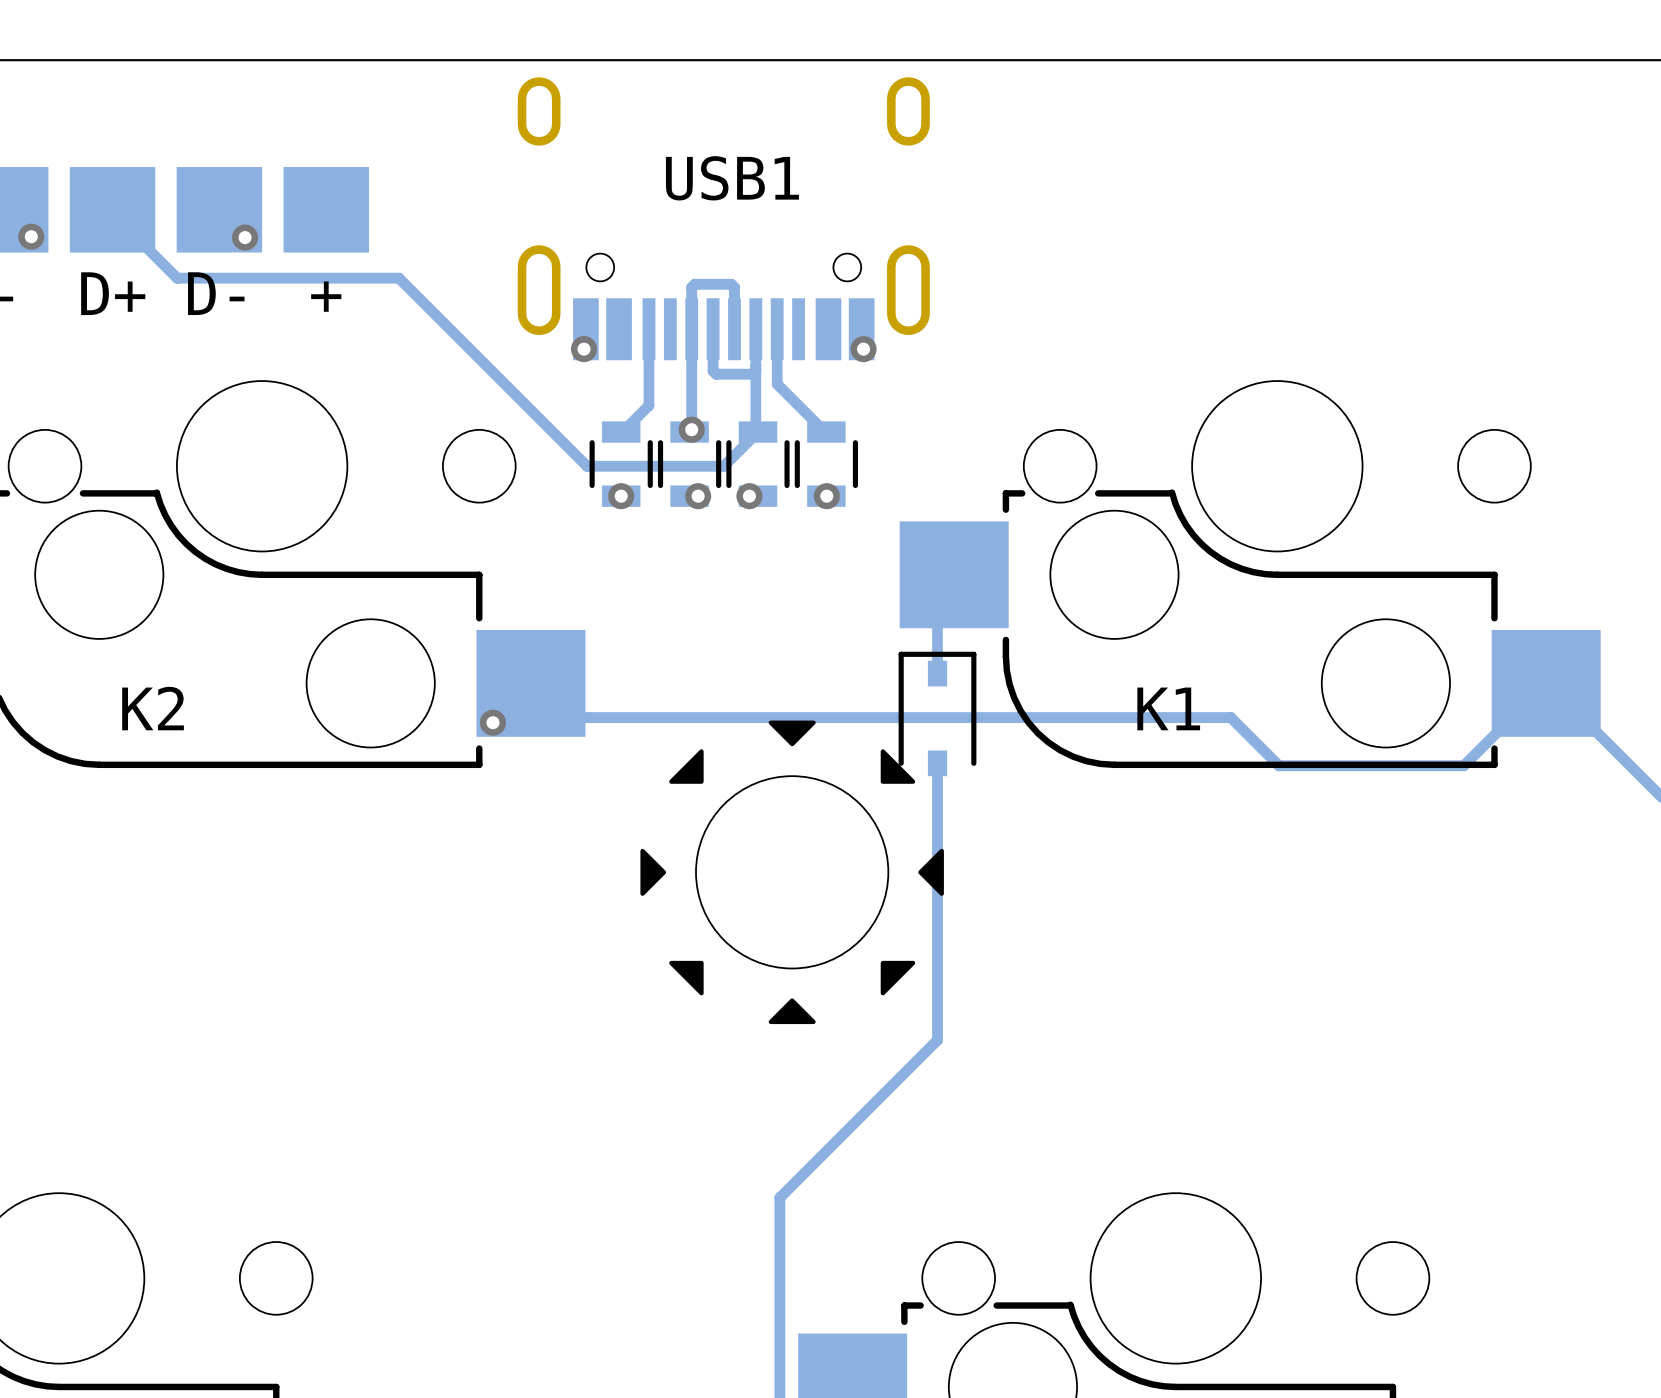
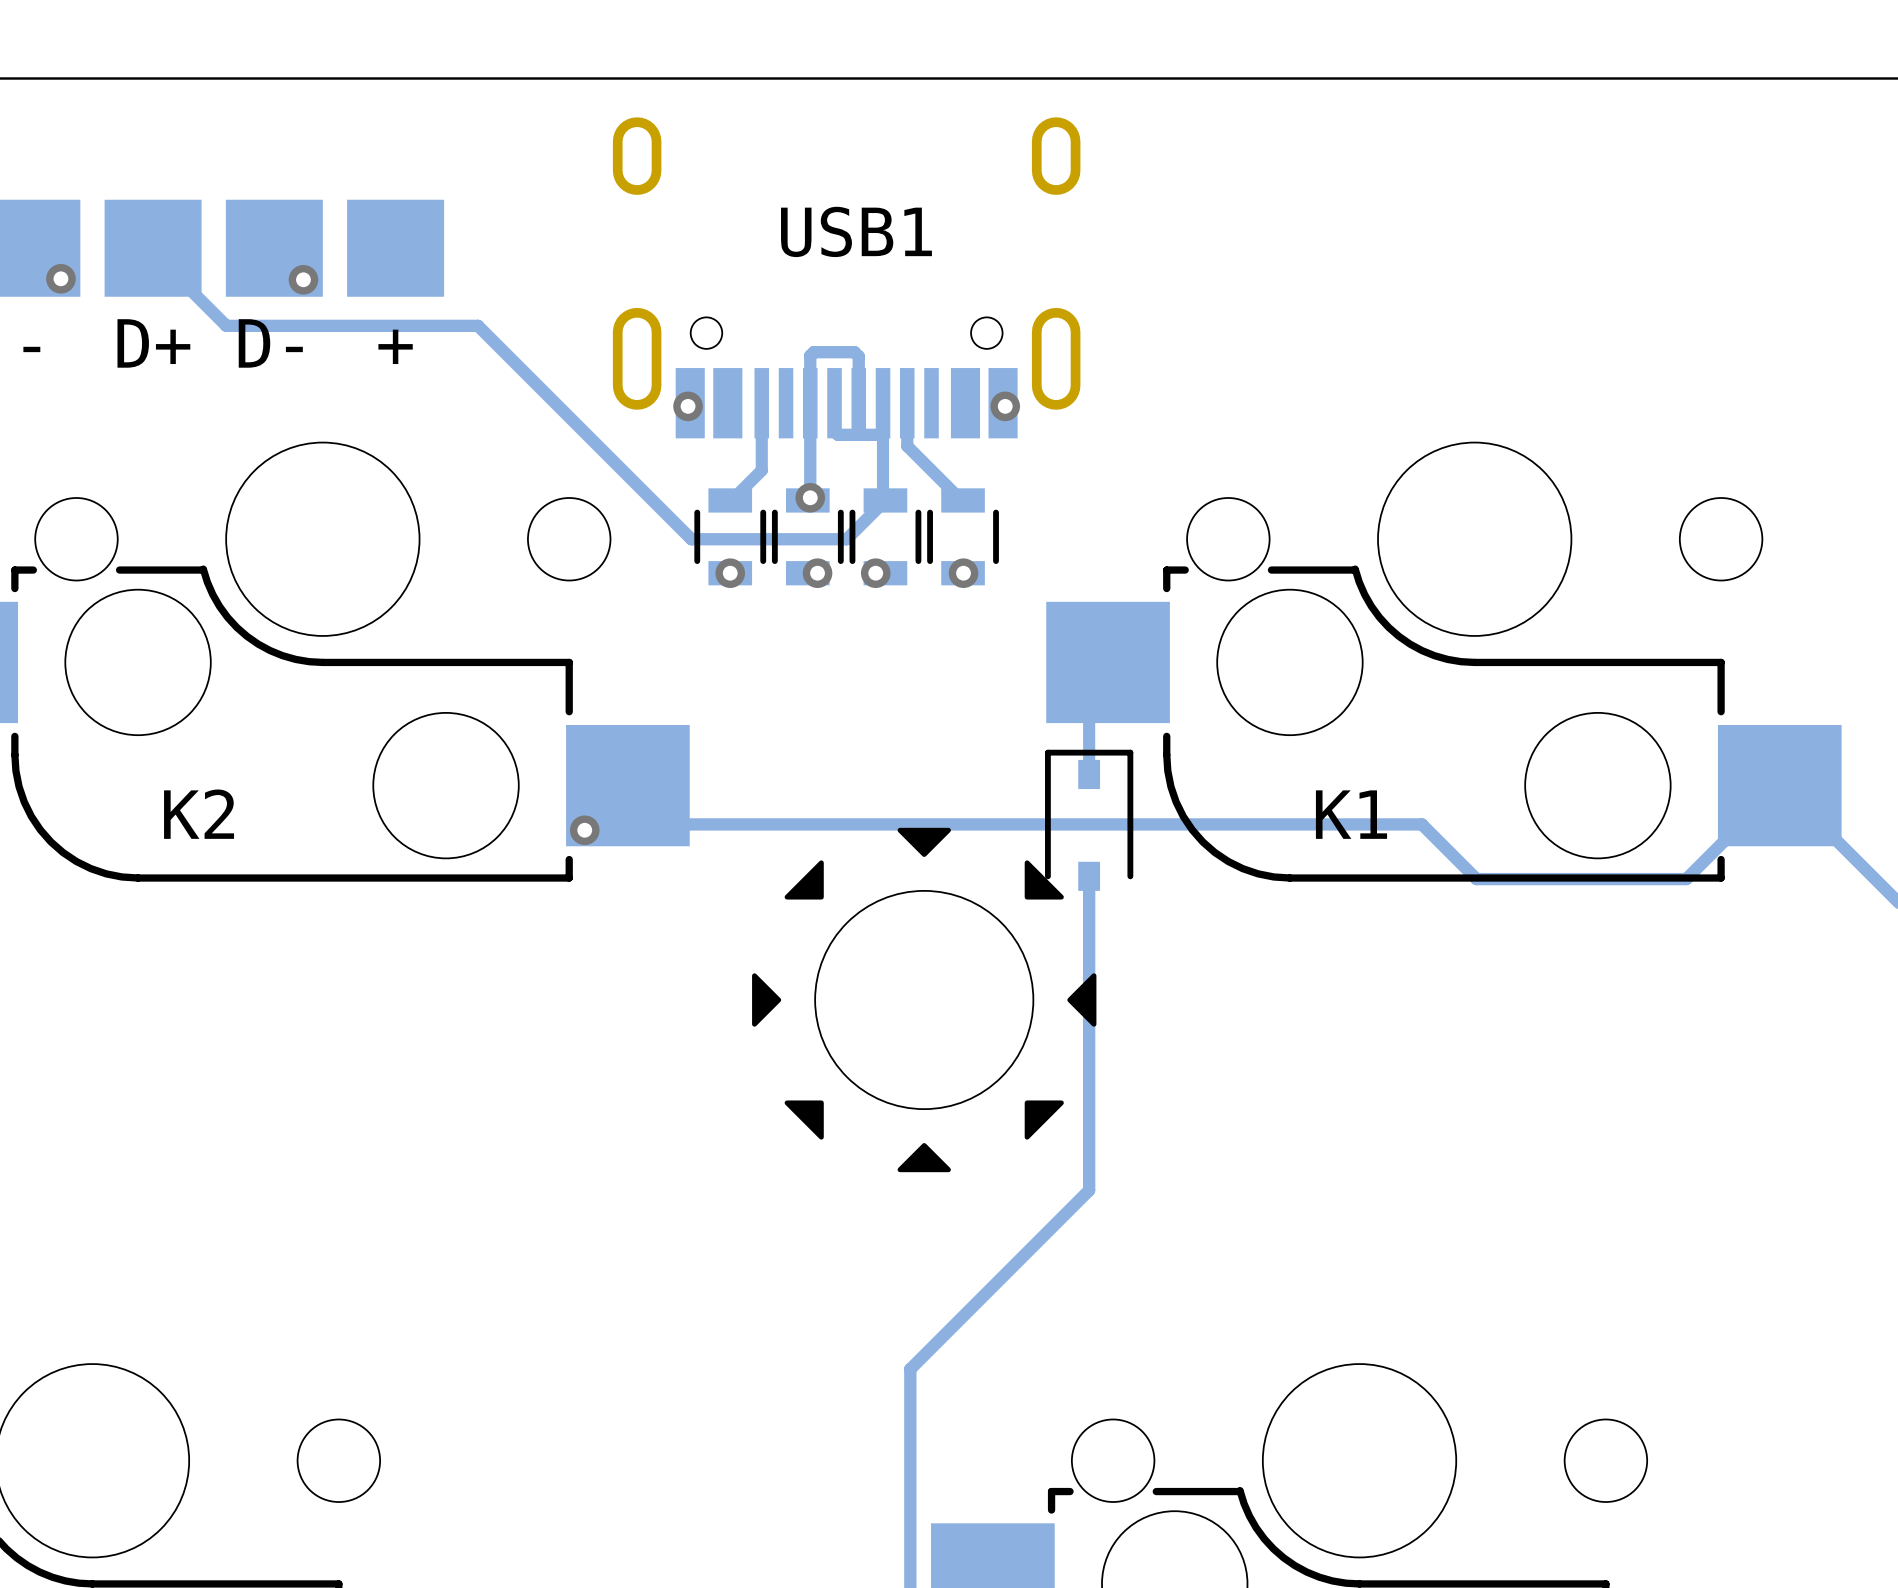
USB1 position: (723, 218) -> (846, 277)
track: (691, 304) (691, 287) (694, 284) (731, 284) (734, 287) (734, 305) -> (810, 355) (813, 352) (854, 352) (858, 356)

